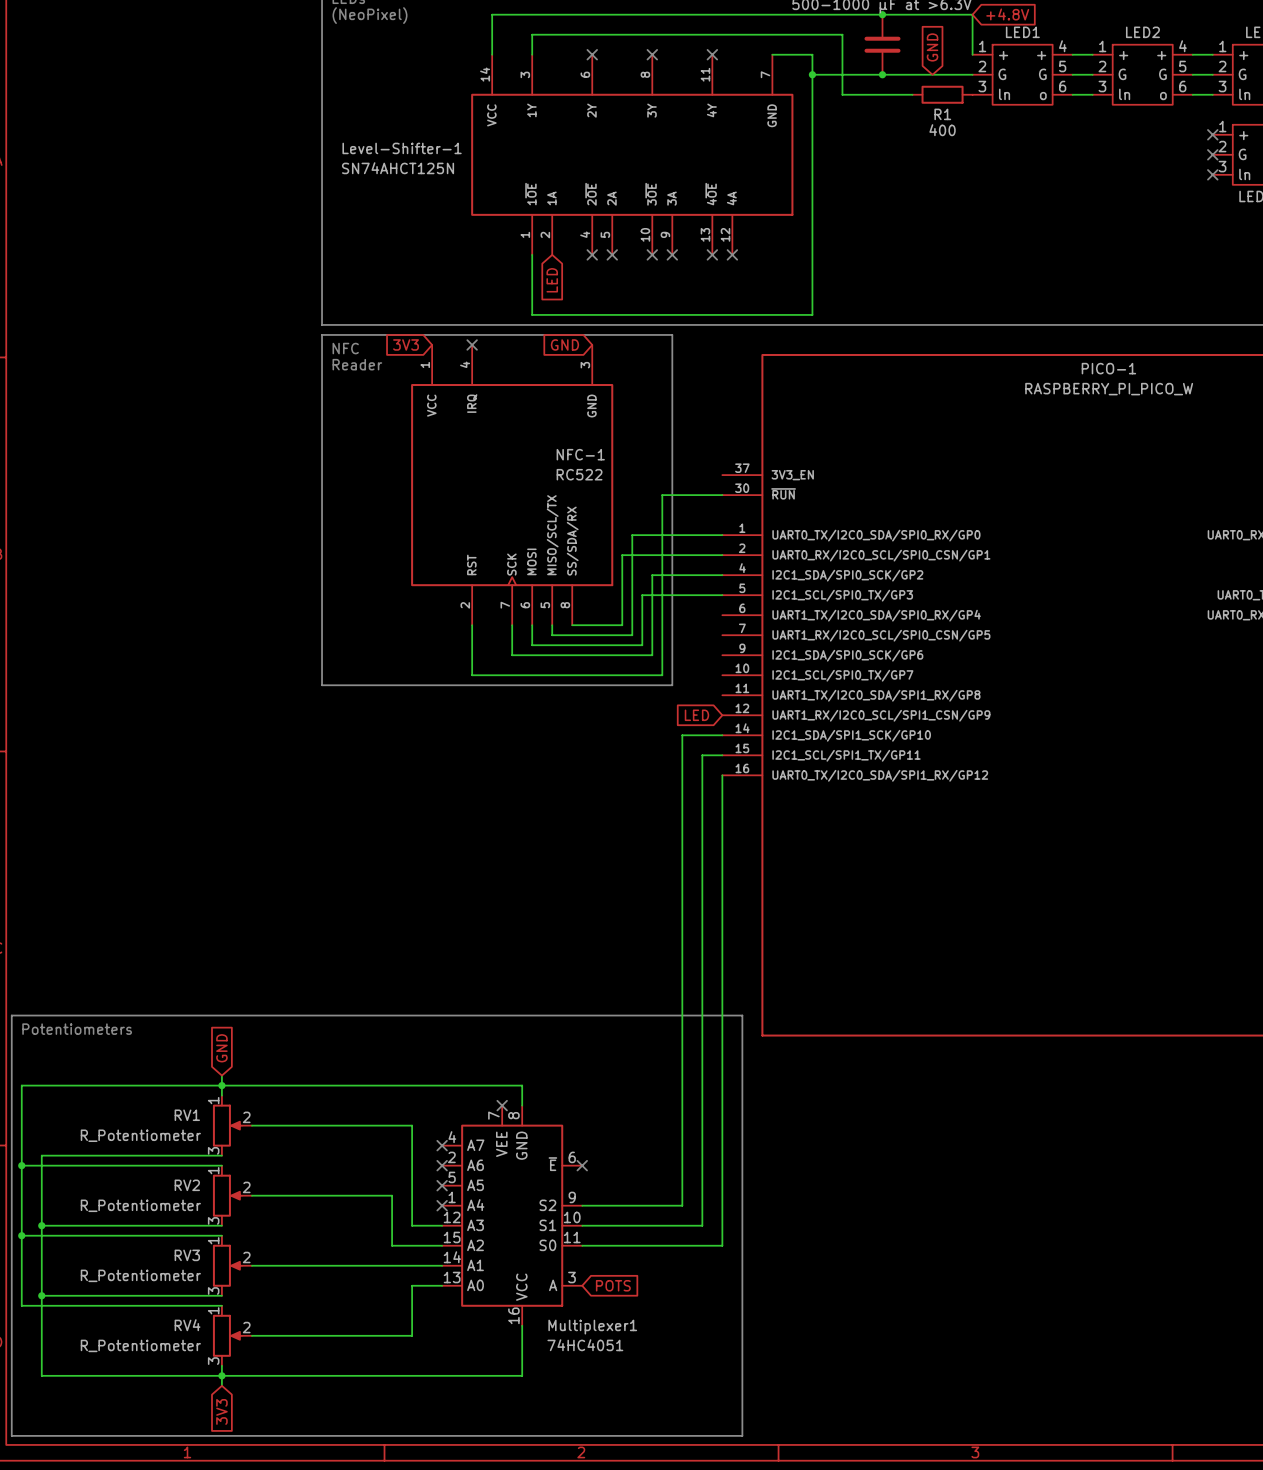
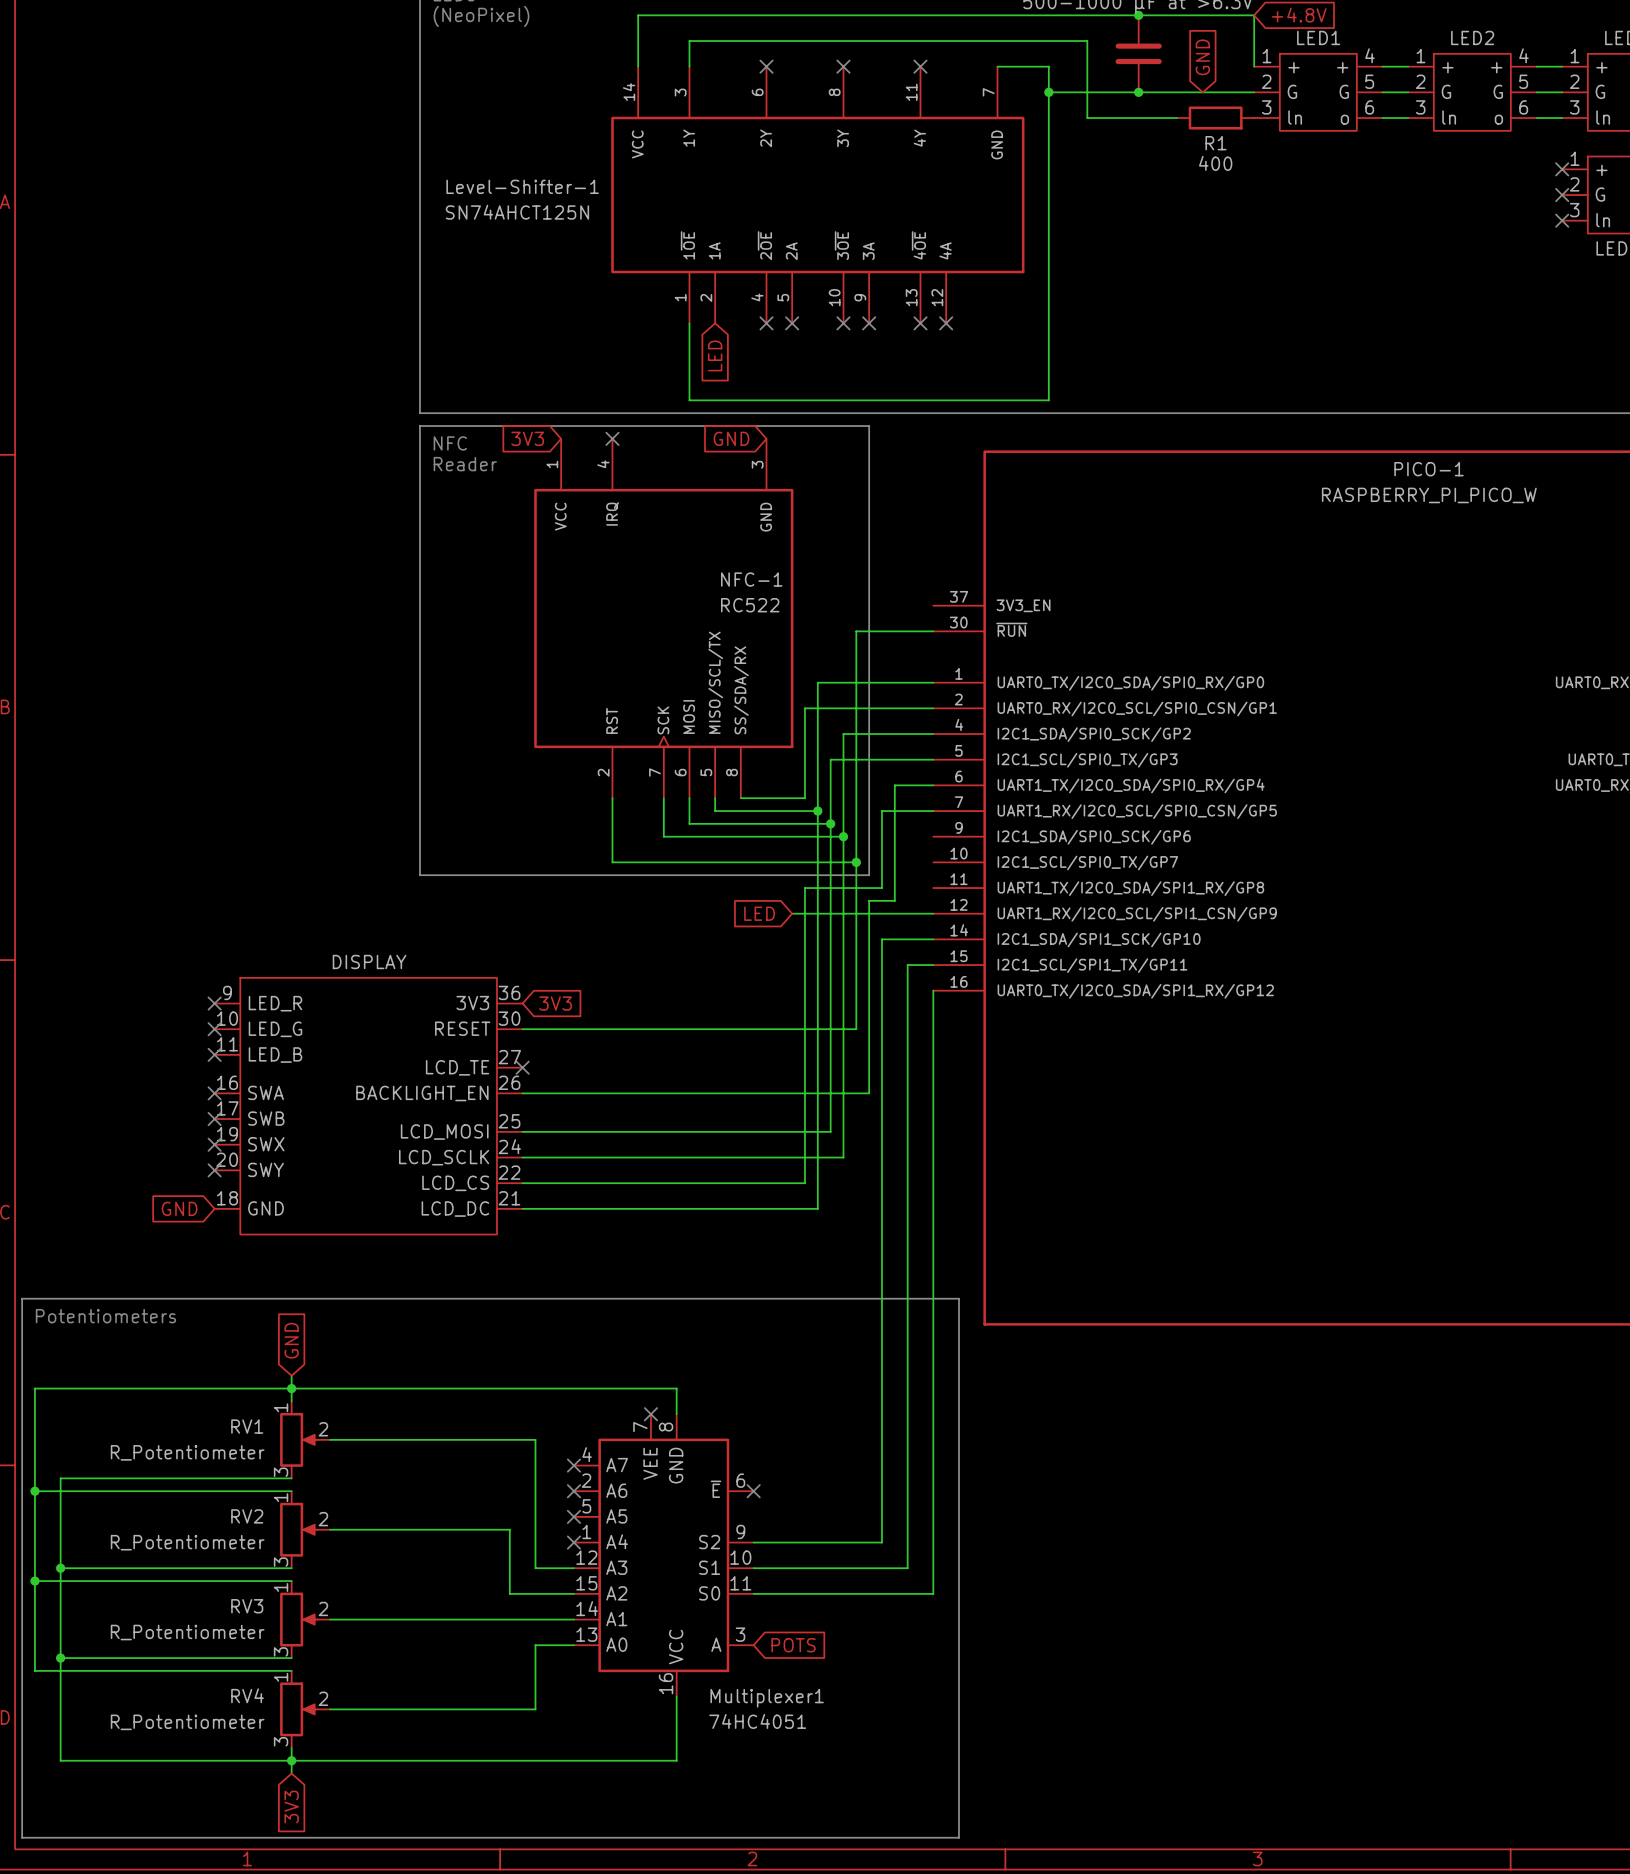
wire: none -> (933, 785) (894, 785) (894, 900) (869, 900) (869, 1093) (522, 1093)
wire: none -> (817, 811) (817, 1208) (522, 1208)
junction: none -> (817, 811)
wire: none -> (933, 811) (881, 811) (881, 888) (804, 888) (804, 1183) (522, 1183)
wire: none -> (830, 823) (830, 1131) (522, 1131)
junction: none -> (830, 823)
wire: none -> (843, 836) (843, 1157) (522, 1157)
junction: none -> (843, 836)
wire: none -> (856, 862) (856, 1029) (522, 1029)
junction: none -> (856, 862)
wire: none -> (792, 913) (933, 913)
global label position: LED (696, 715) -> LED (759, 913)
no-connect mark: none -> (214, 1003)
global label: none -> 3V3 (555, 1003)
no-connect mark: none -> (214, 1029)
no-connect mark: none -> (214, 1054)
no-connect mark: none -> (522, 1067)
no-connect mark: none -> (214, 1093)
DISPLAY: none -> (368, 1106)
no-connect mark: none -> (214, 1119)
no-connect mark: none -> (214, 1144)
no-connect mark: none -> (214, 1170)
global label: none -> GND (179, 1208)

